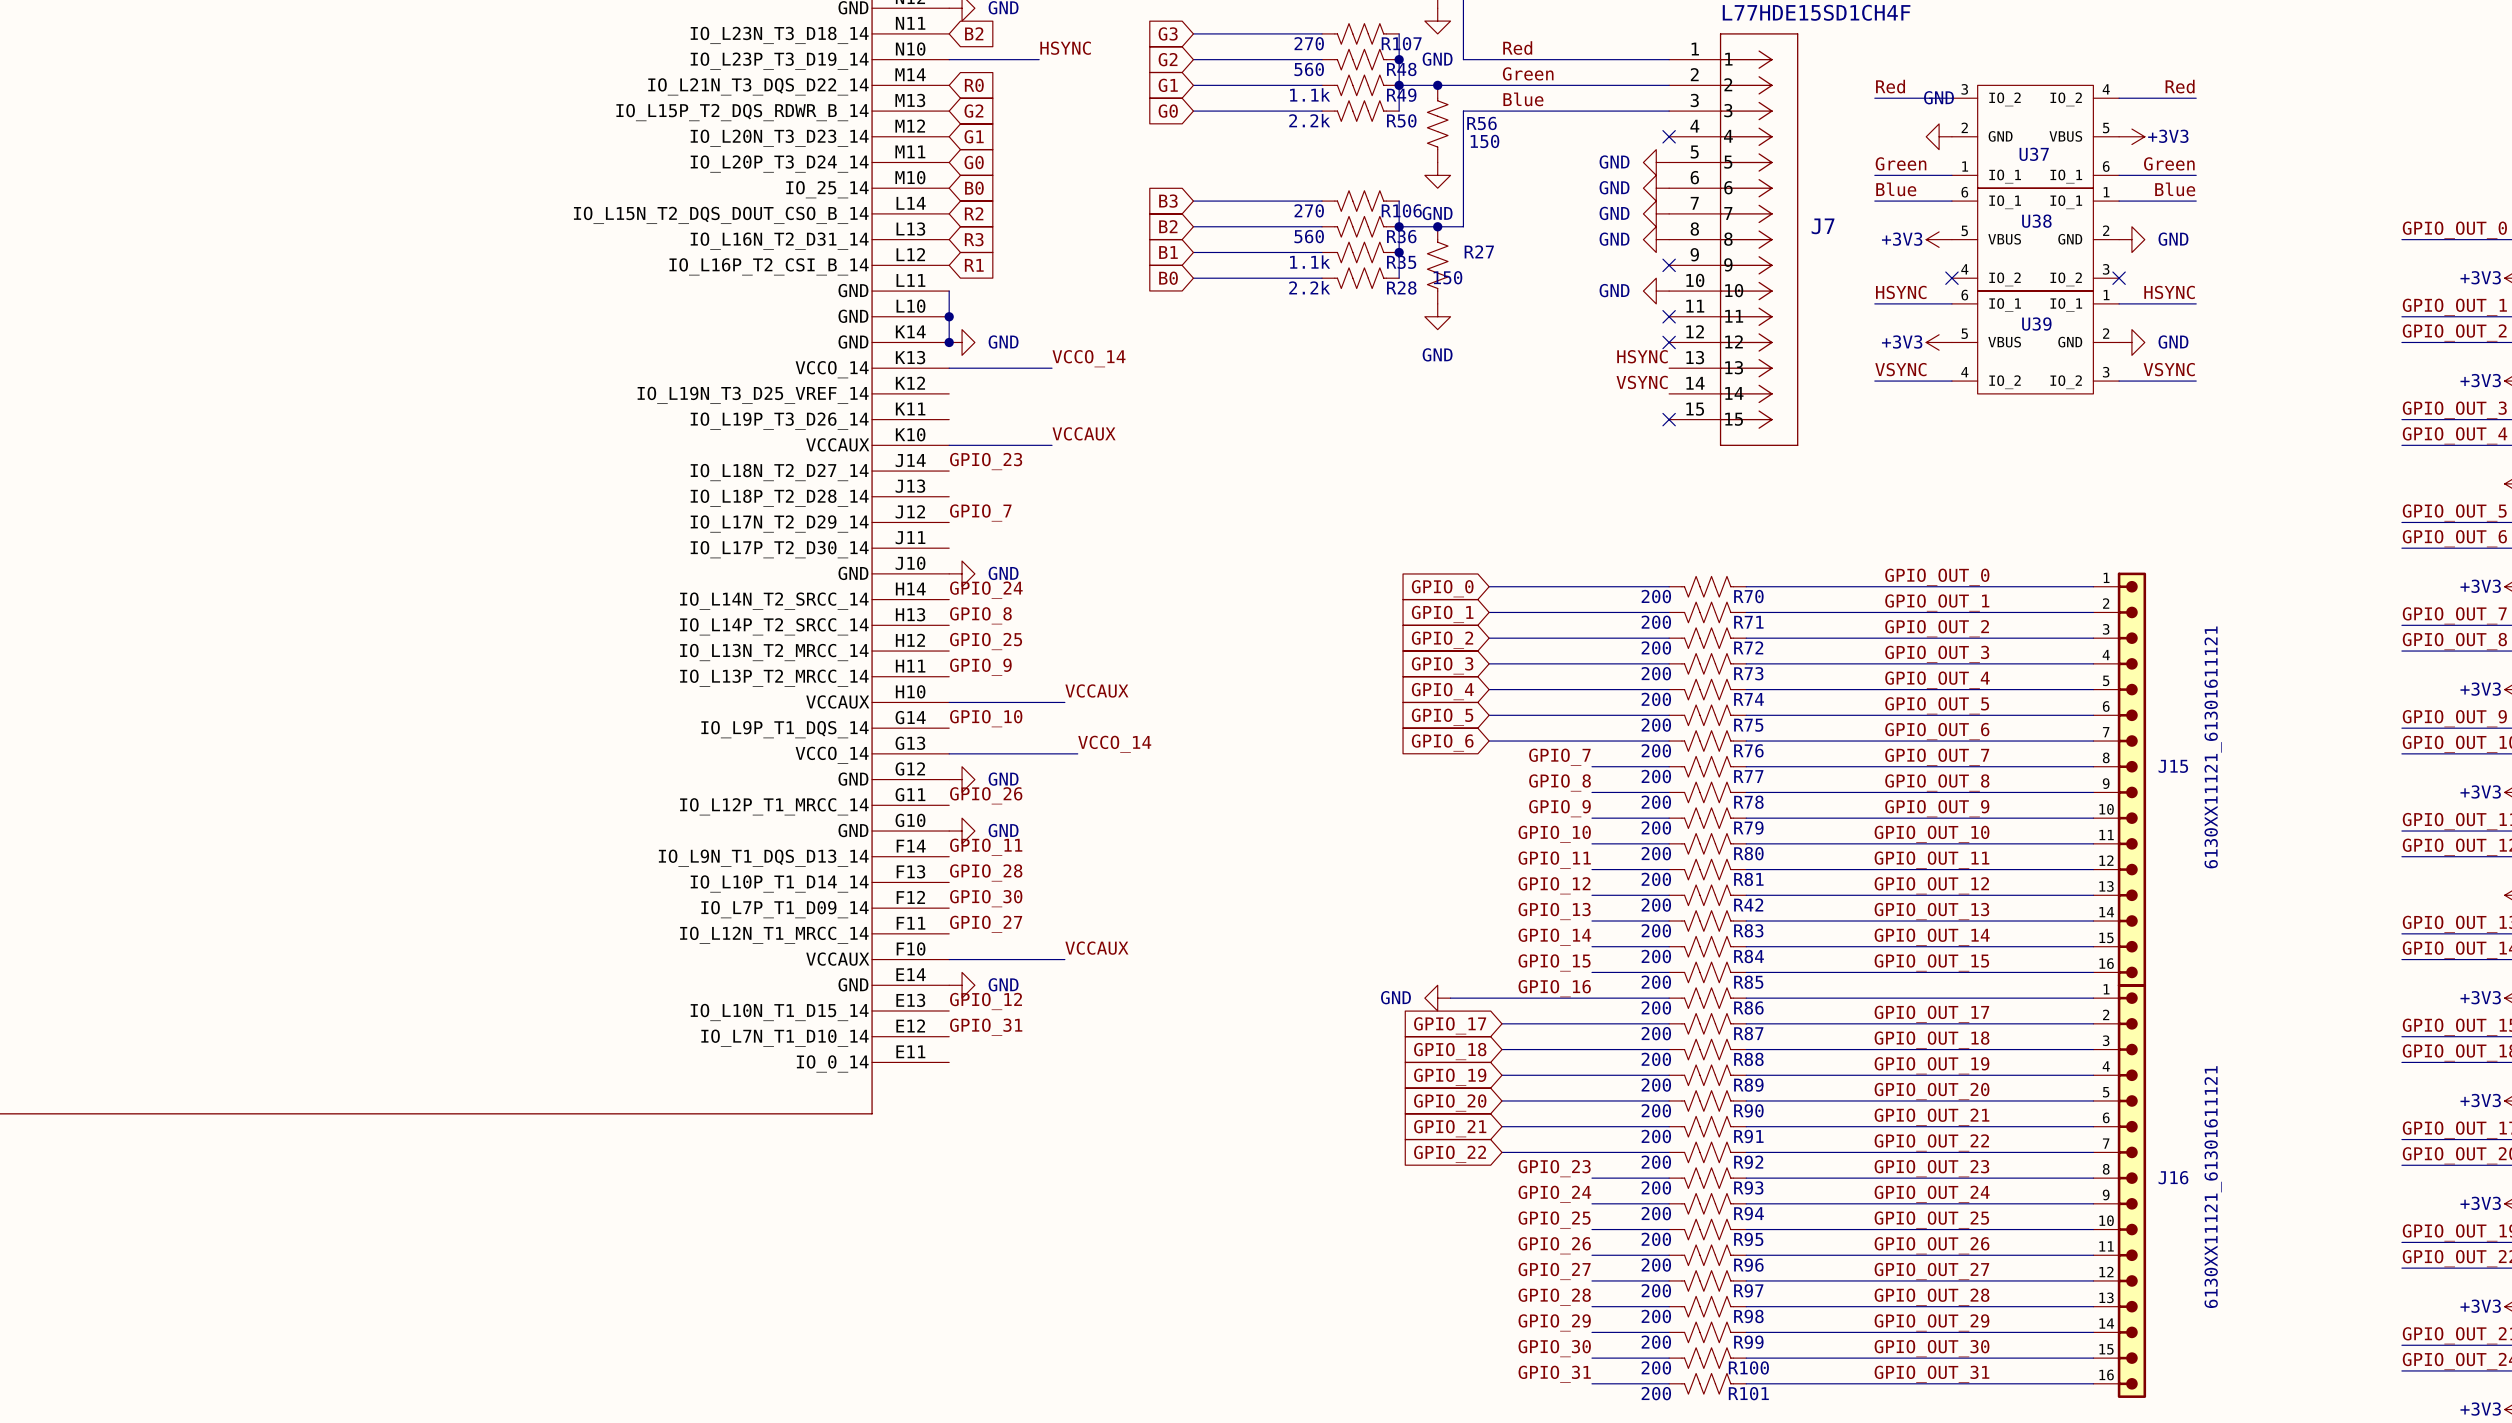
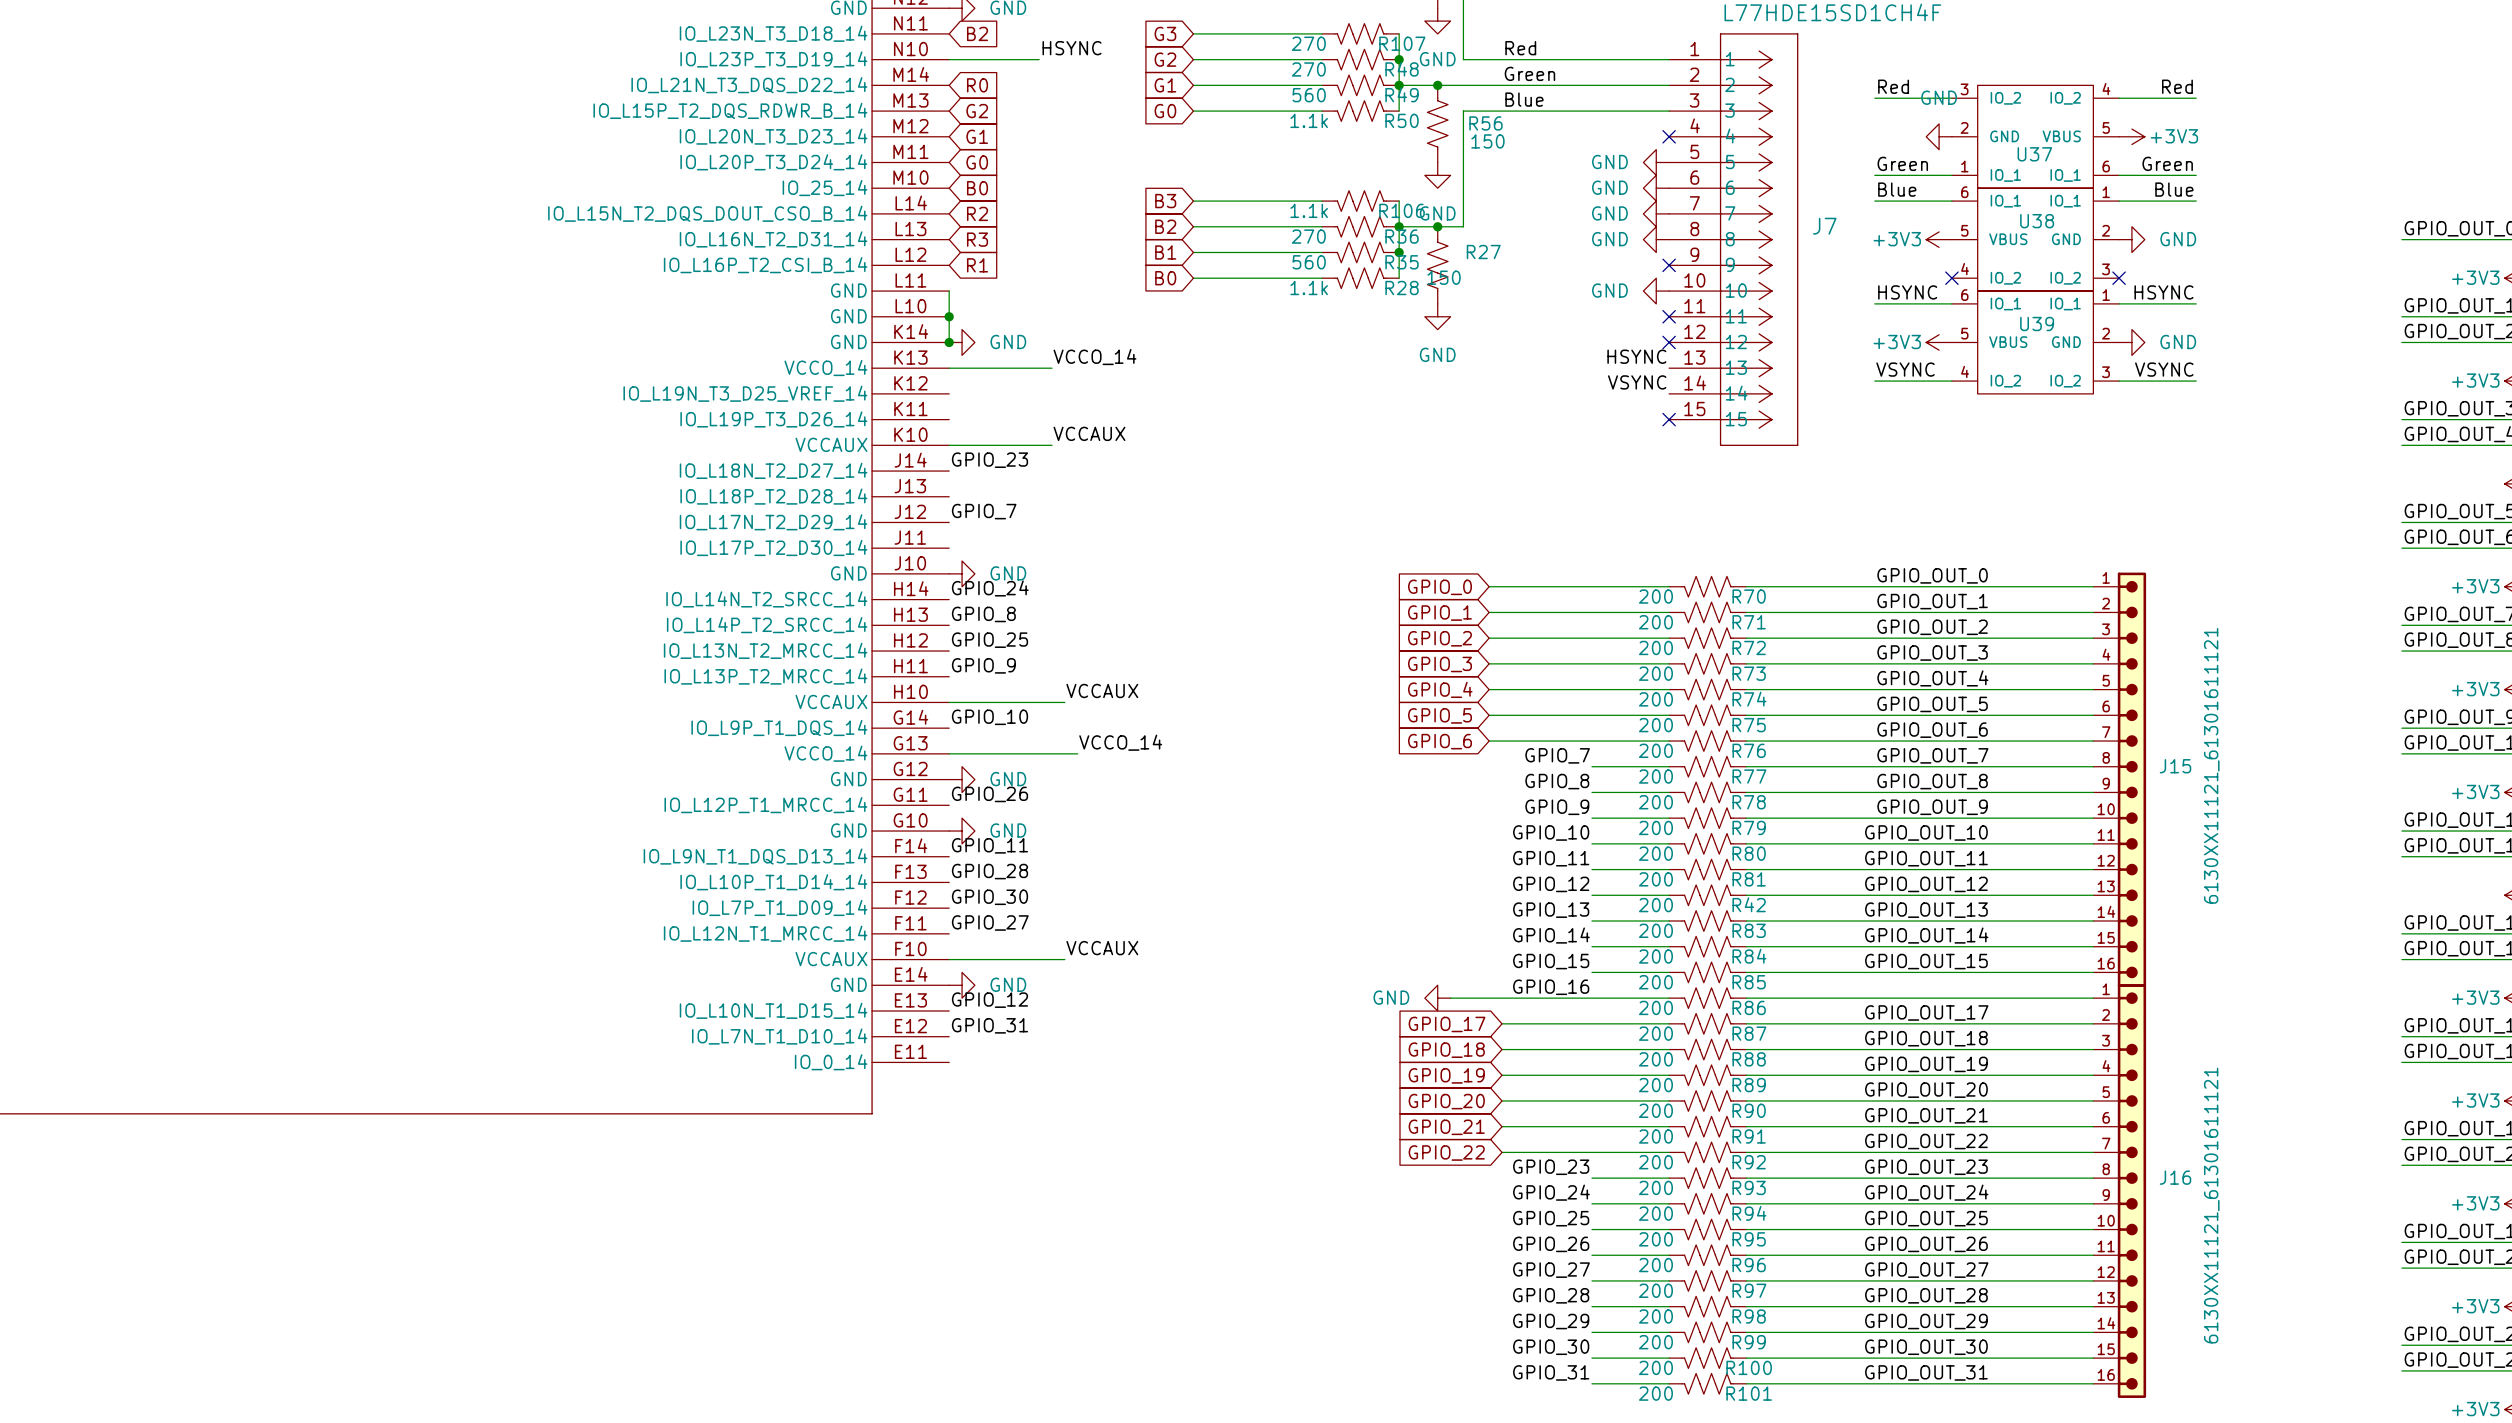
R48 value: 560 (1309, 69) -> 270 (1308, 69)
R49 value: 1.1k (1310, 94) -> 560 (1309, 95)
R50 value: 2.2k (1309, 120) -> 1.1k (1309, 120)
R106 value: 270 (1309, 210) -> 1.1k (1309, 210)
R36 value: 560 (1309, 236) -> 270 (1308, 236)
R35 value: 1.1k (1310, 262) -> 560 (1309, 262)
R28 value: 2.2k (1309, 287) -> 1.1k (1309, 288)

